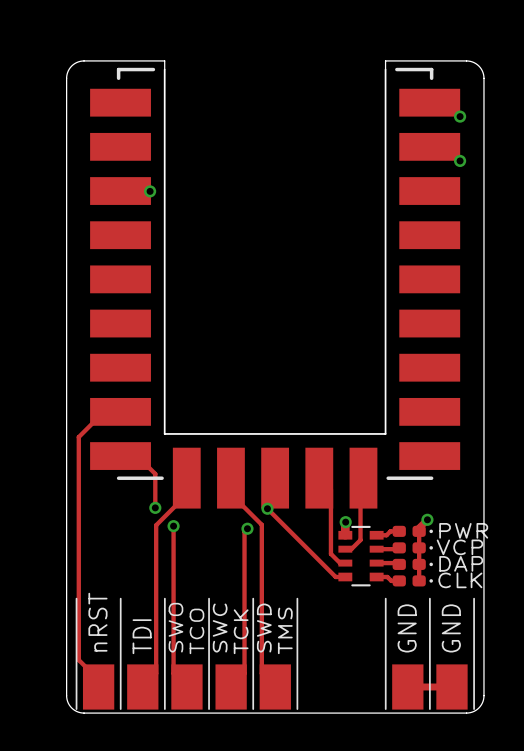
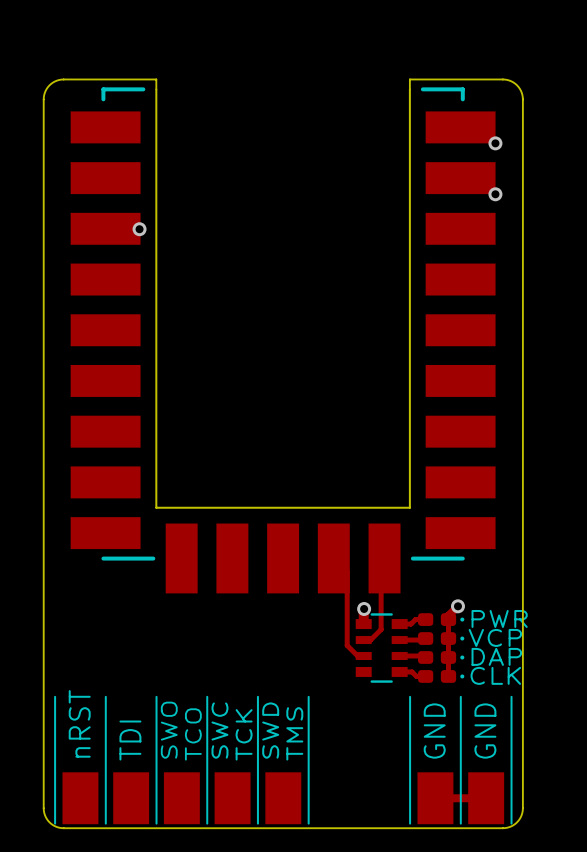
track: (120, 411) (104, 411) (78, 437) (78, 660) (98, 679) (98, 686) -> none
track: (120, 456) (137, 456) (155, 473) (155, 507) -> none
track: (186, 478) (186, 494) (156, 525) (156, 673) (142, 686) -> none
track: (230, 478) (230, 493) (261, 524) (261, 673) (275, 686) -> none
track: (275, 478) (275, 501) (267, 508) (335, 577) (345, 577) -> none
via: (155, 507) -> none
via: (267, 508) -> none
track: (173, 526) (173, 673) (186, 686) -> none
via: (173, 526) -> none
track: (247, 528) (244, 531) (244, 673) (231, 686) -> none
via: (247, 528) -> none

